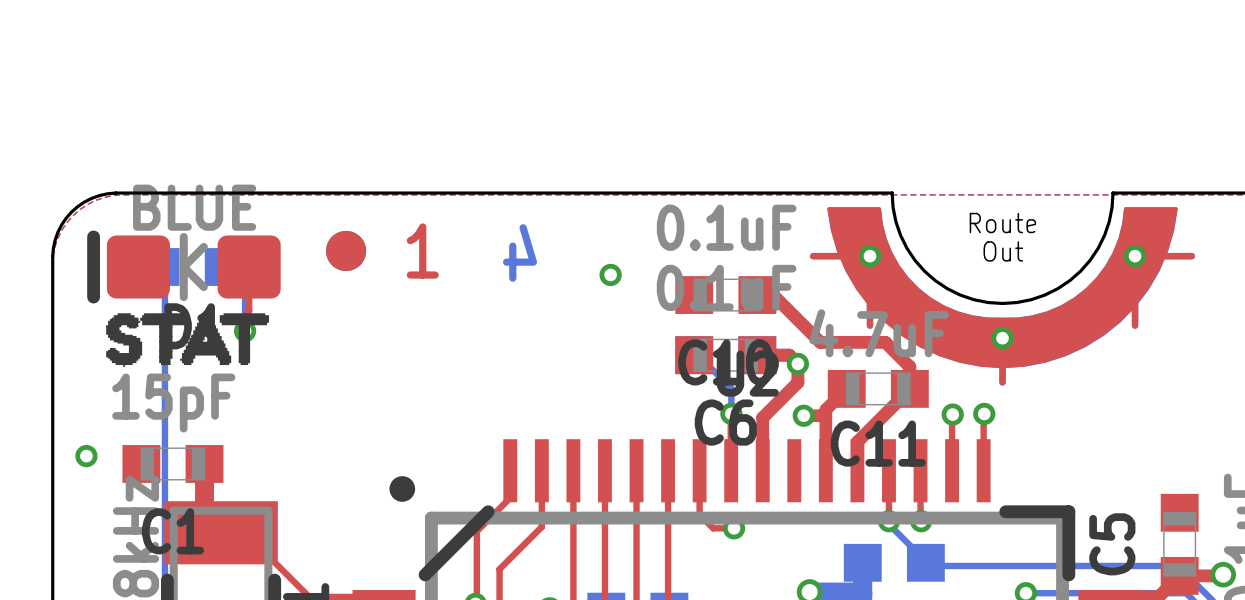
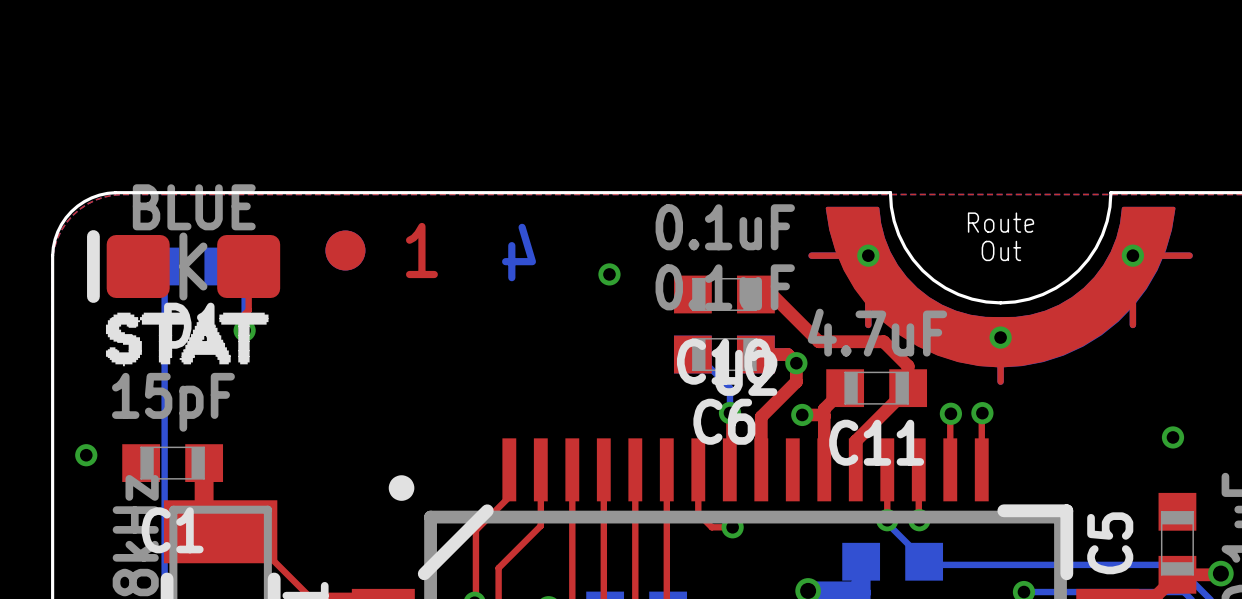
via: none -> (1173, 437)

